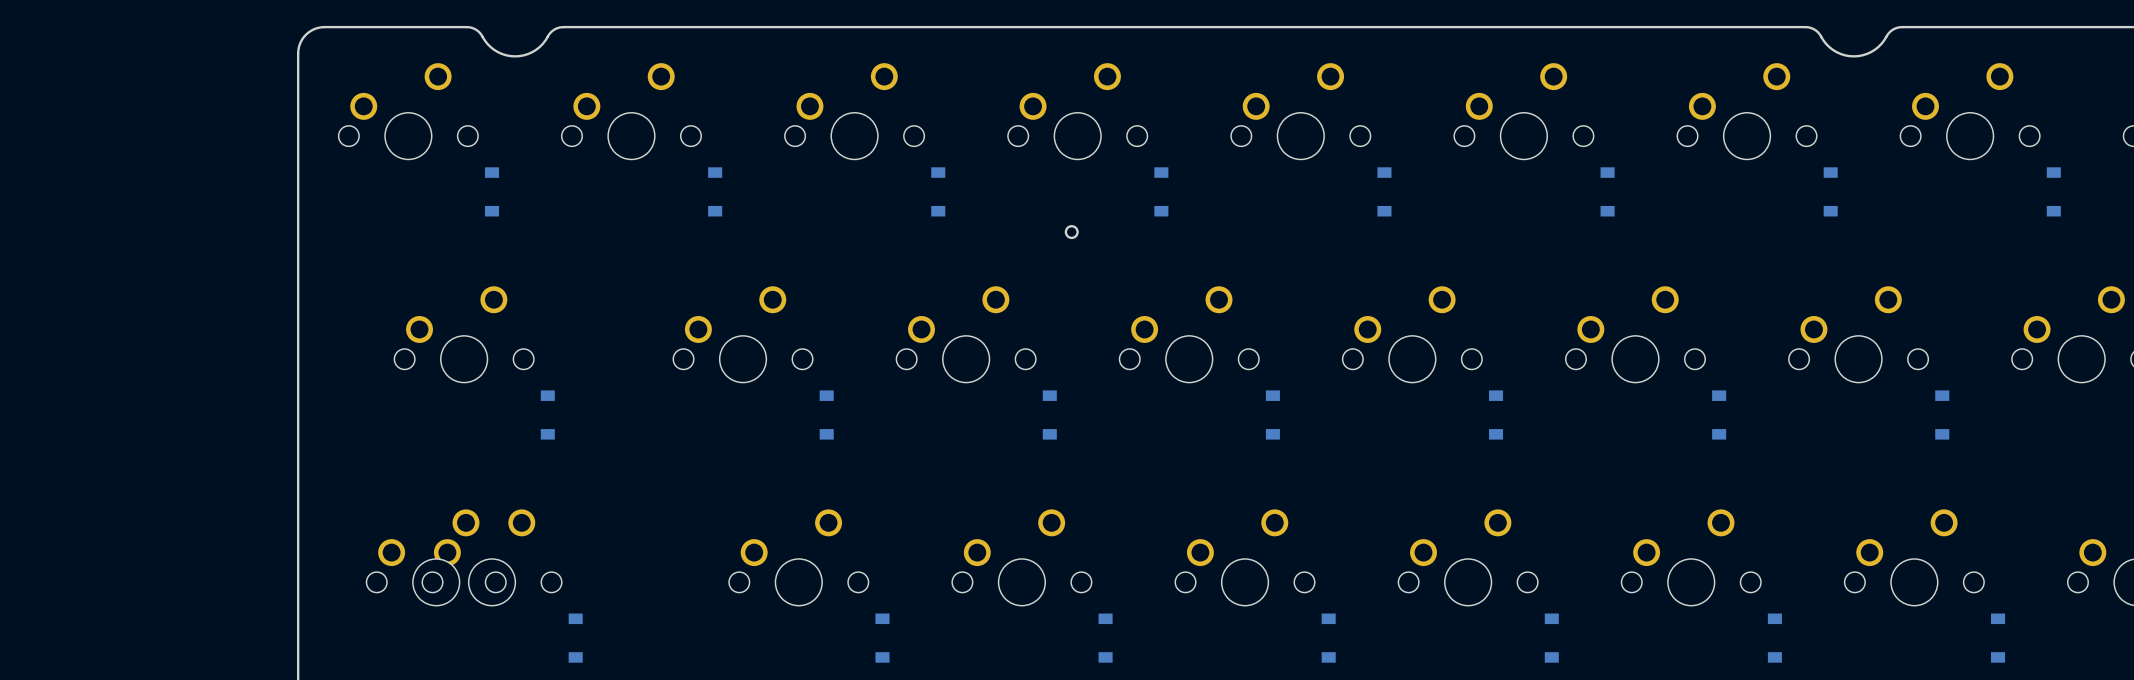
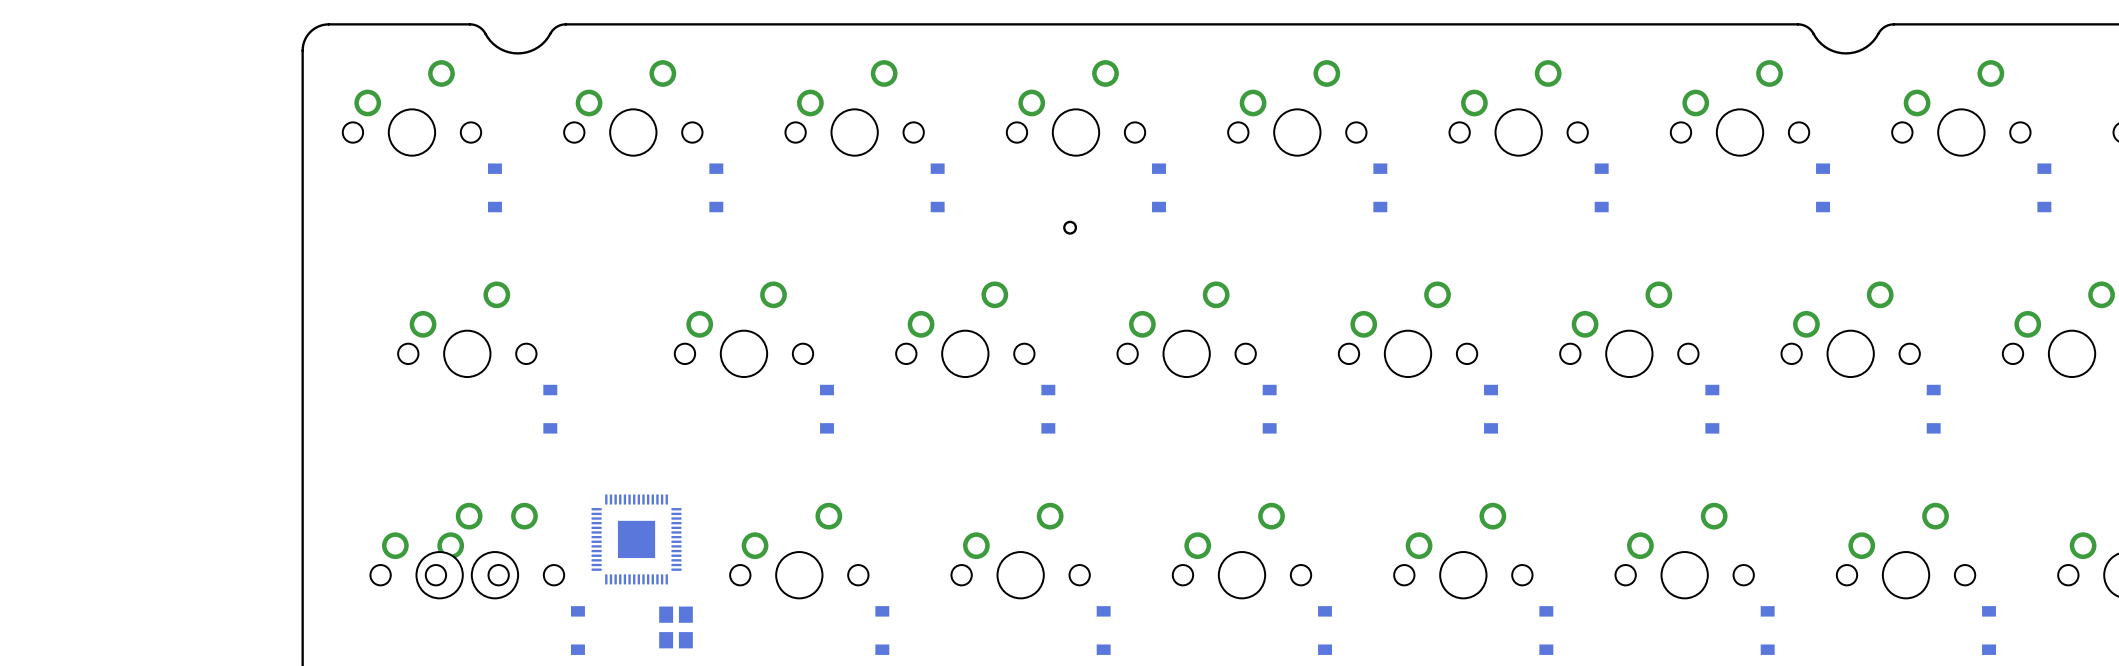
part: none -> (636, 539)
part: none -> (676, 627)

